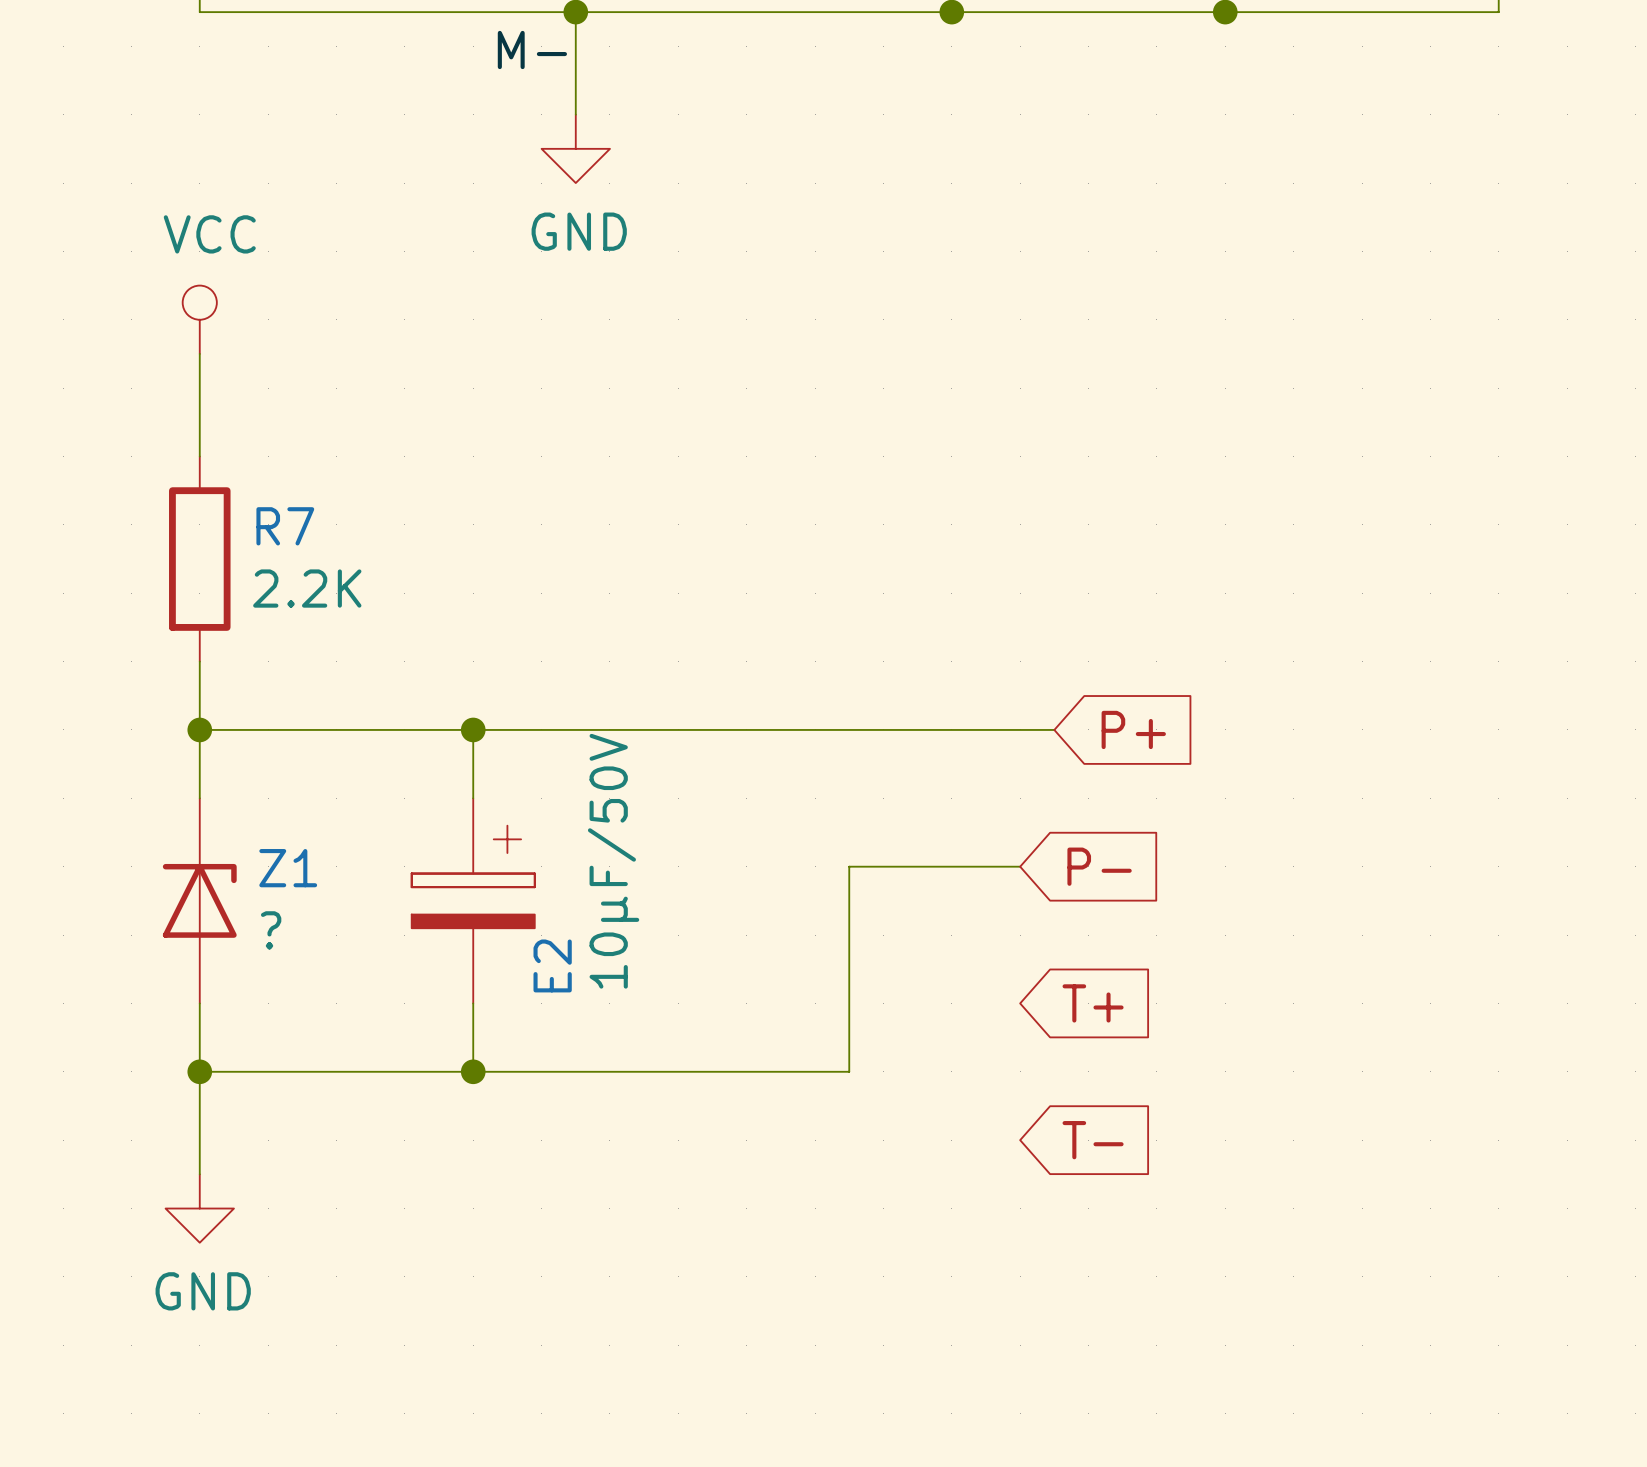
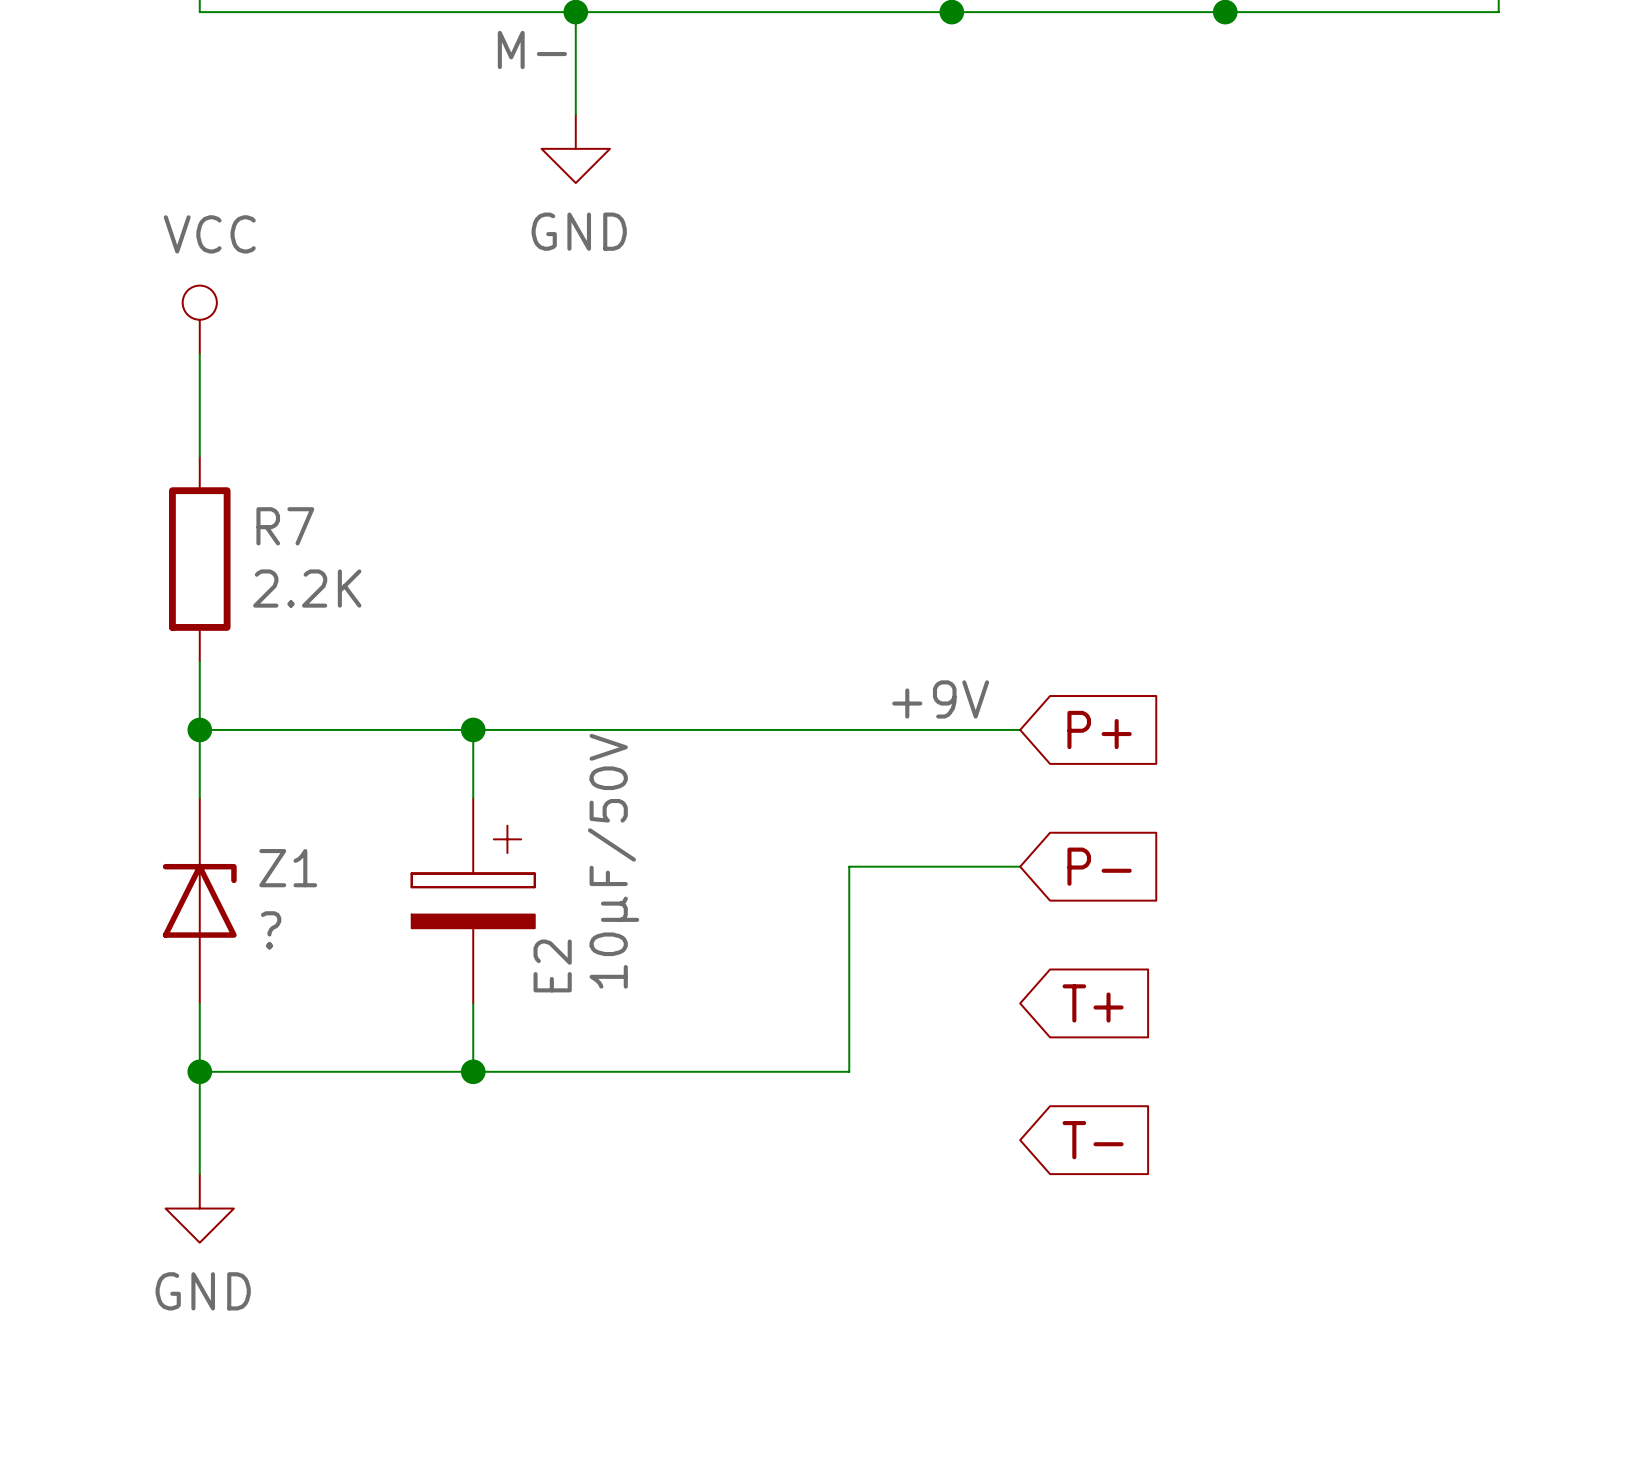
label: none -> +9V (940, 699)
wire: (1020, 729) (1054, 729) -> none
global label position: P+ (1133, 729) -> P+ (1099, 729)

